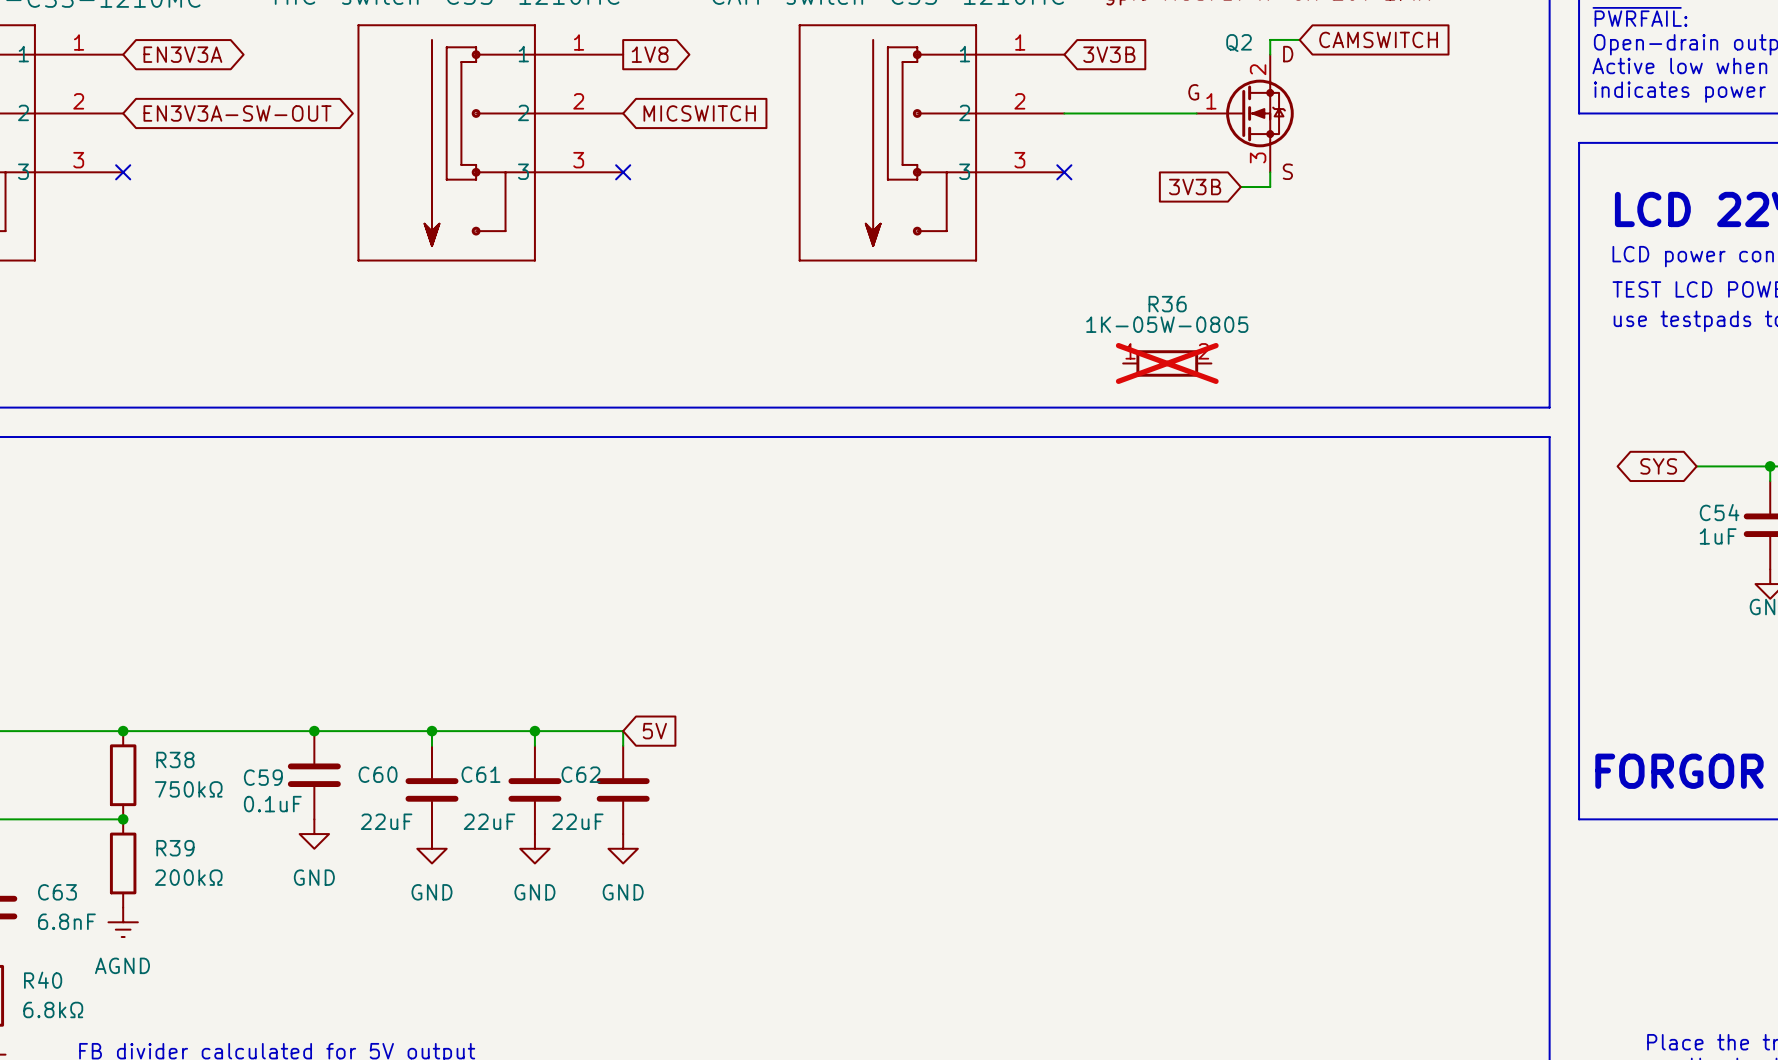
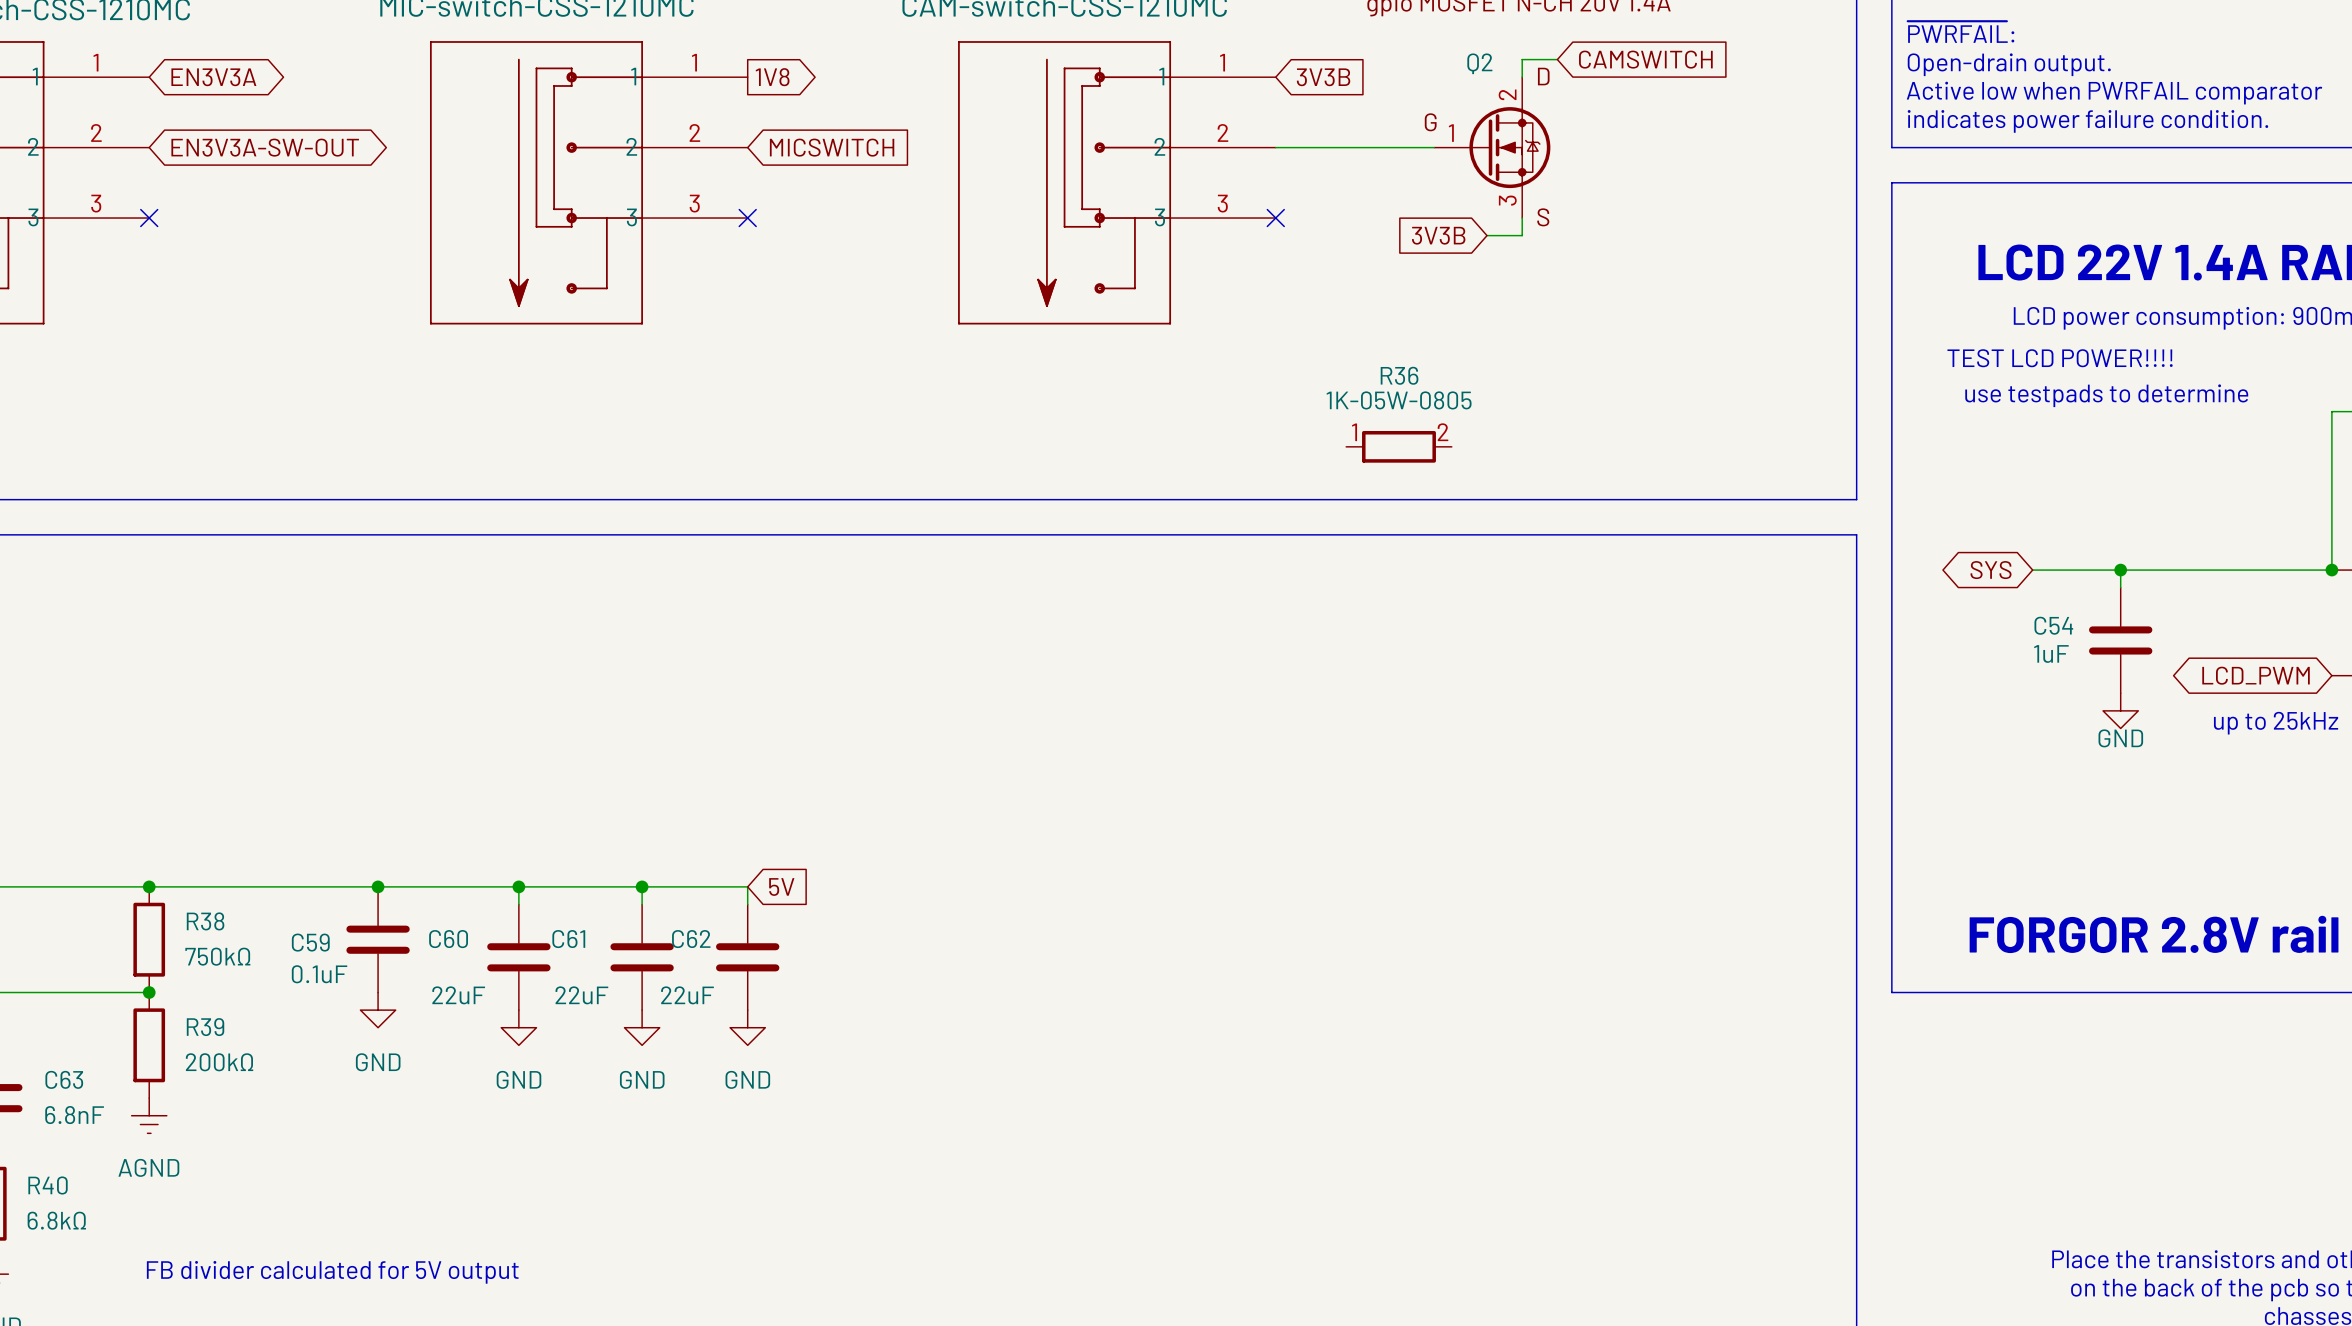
R36 do-not-place cross: (1167, 363) -> none

